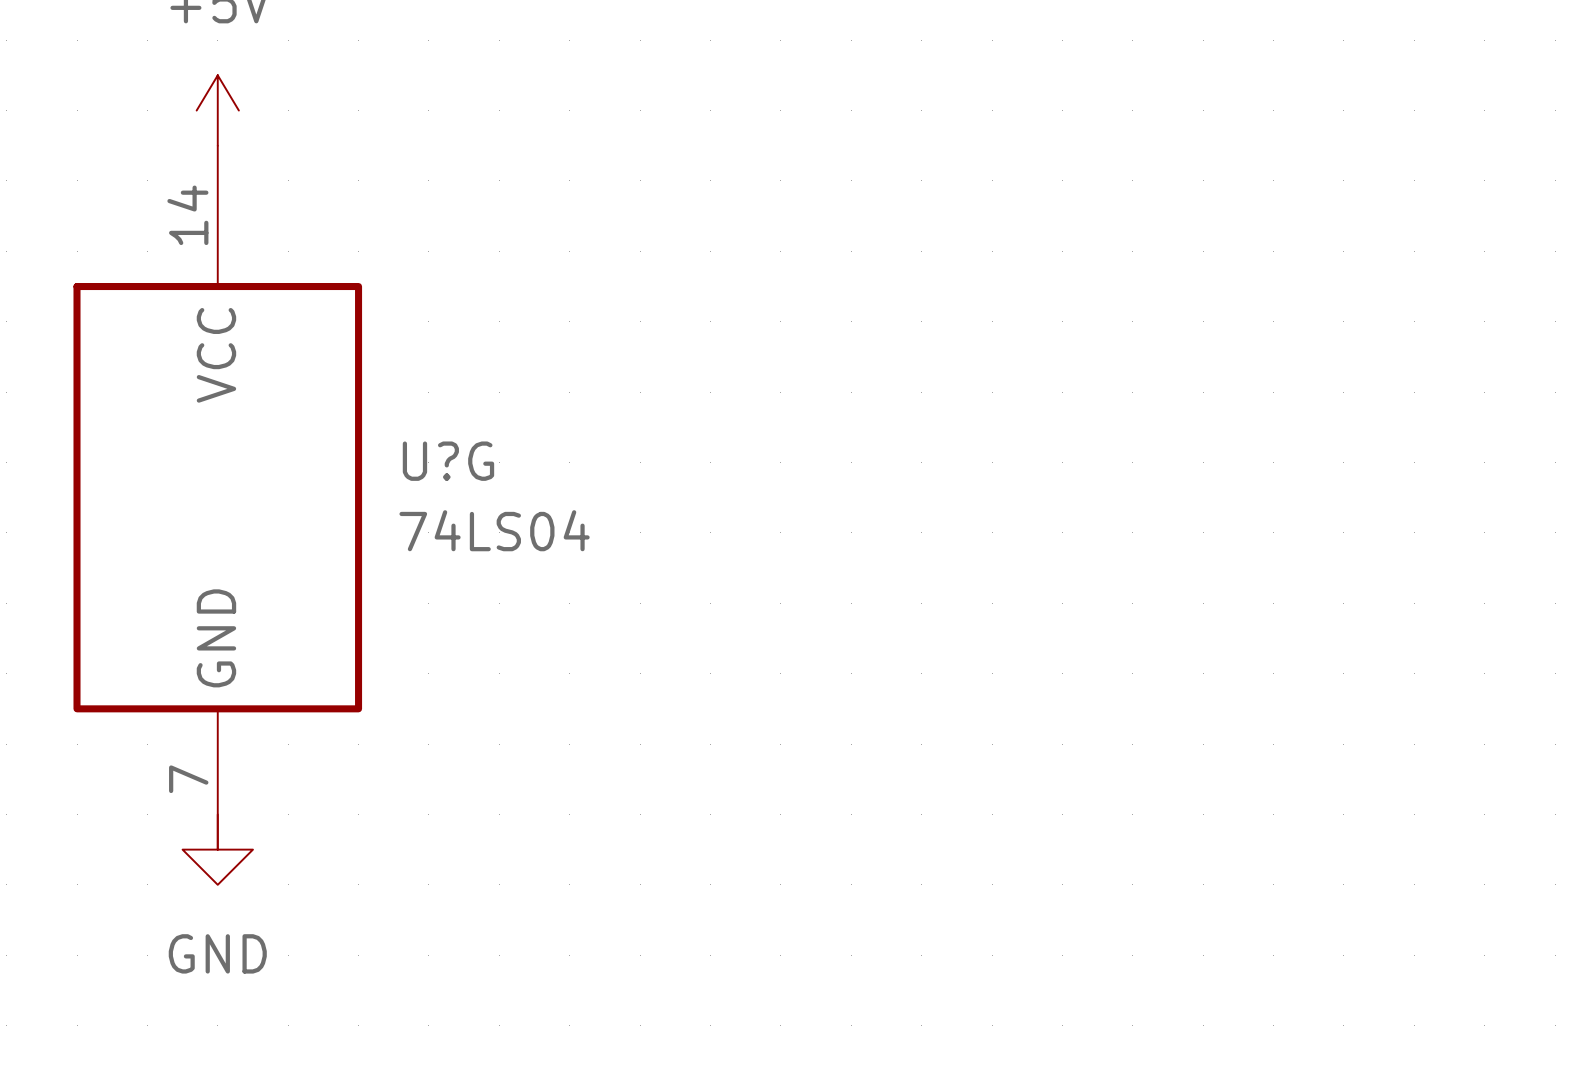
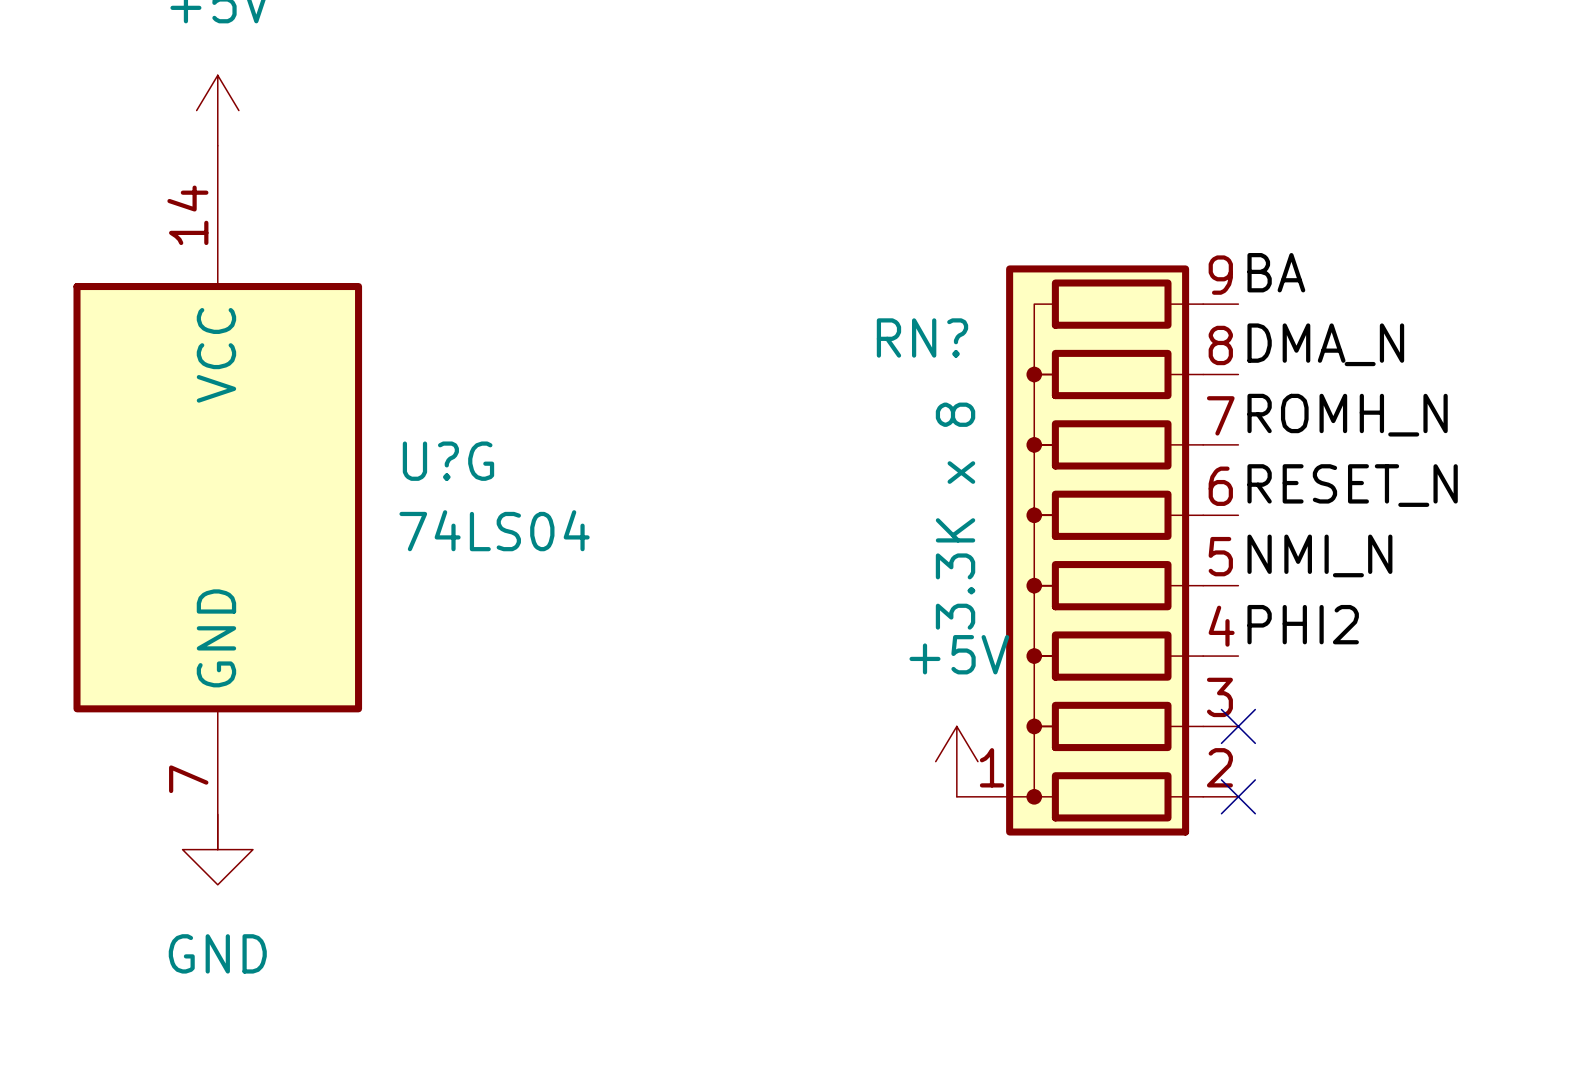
label: none -> BA (1276, 272)
label: none -> DMA_N (1325, 344)
label: none -> ROMH_N (1347, 415)
label: none -> RESET_N (1352, 485)
RN?: none -> 3.3K x 8 (1097, 550)
label: none -> NMI_N (1319, 555)
label: none -> PHI2 (1303, 624)
no-connect mark: none -> (1238, 726)
power symbol: none -> +5V (956, 761)
no-connect mark: none -> (1238, 796)

